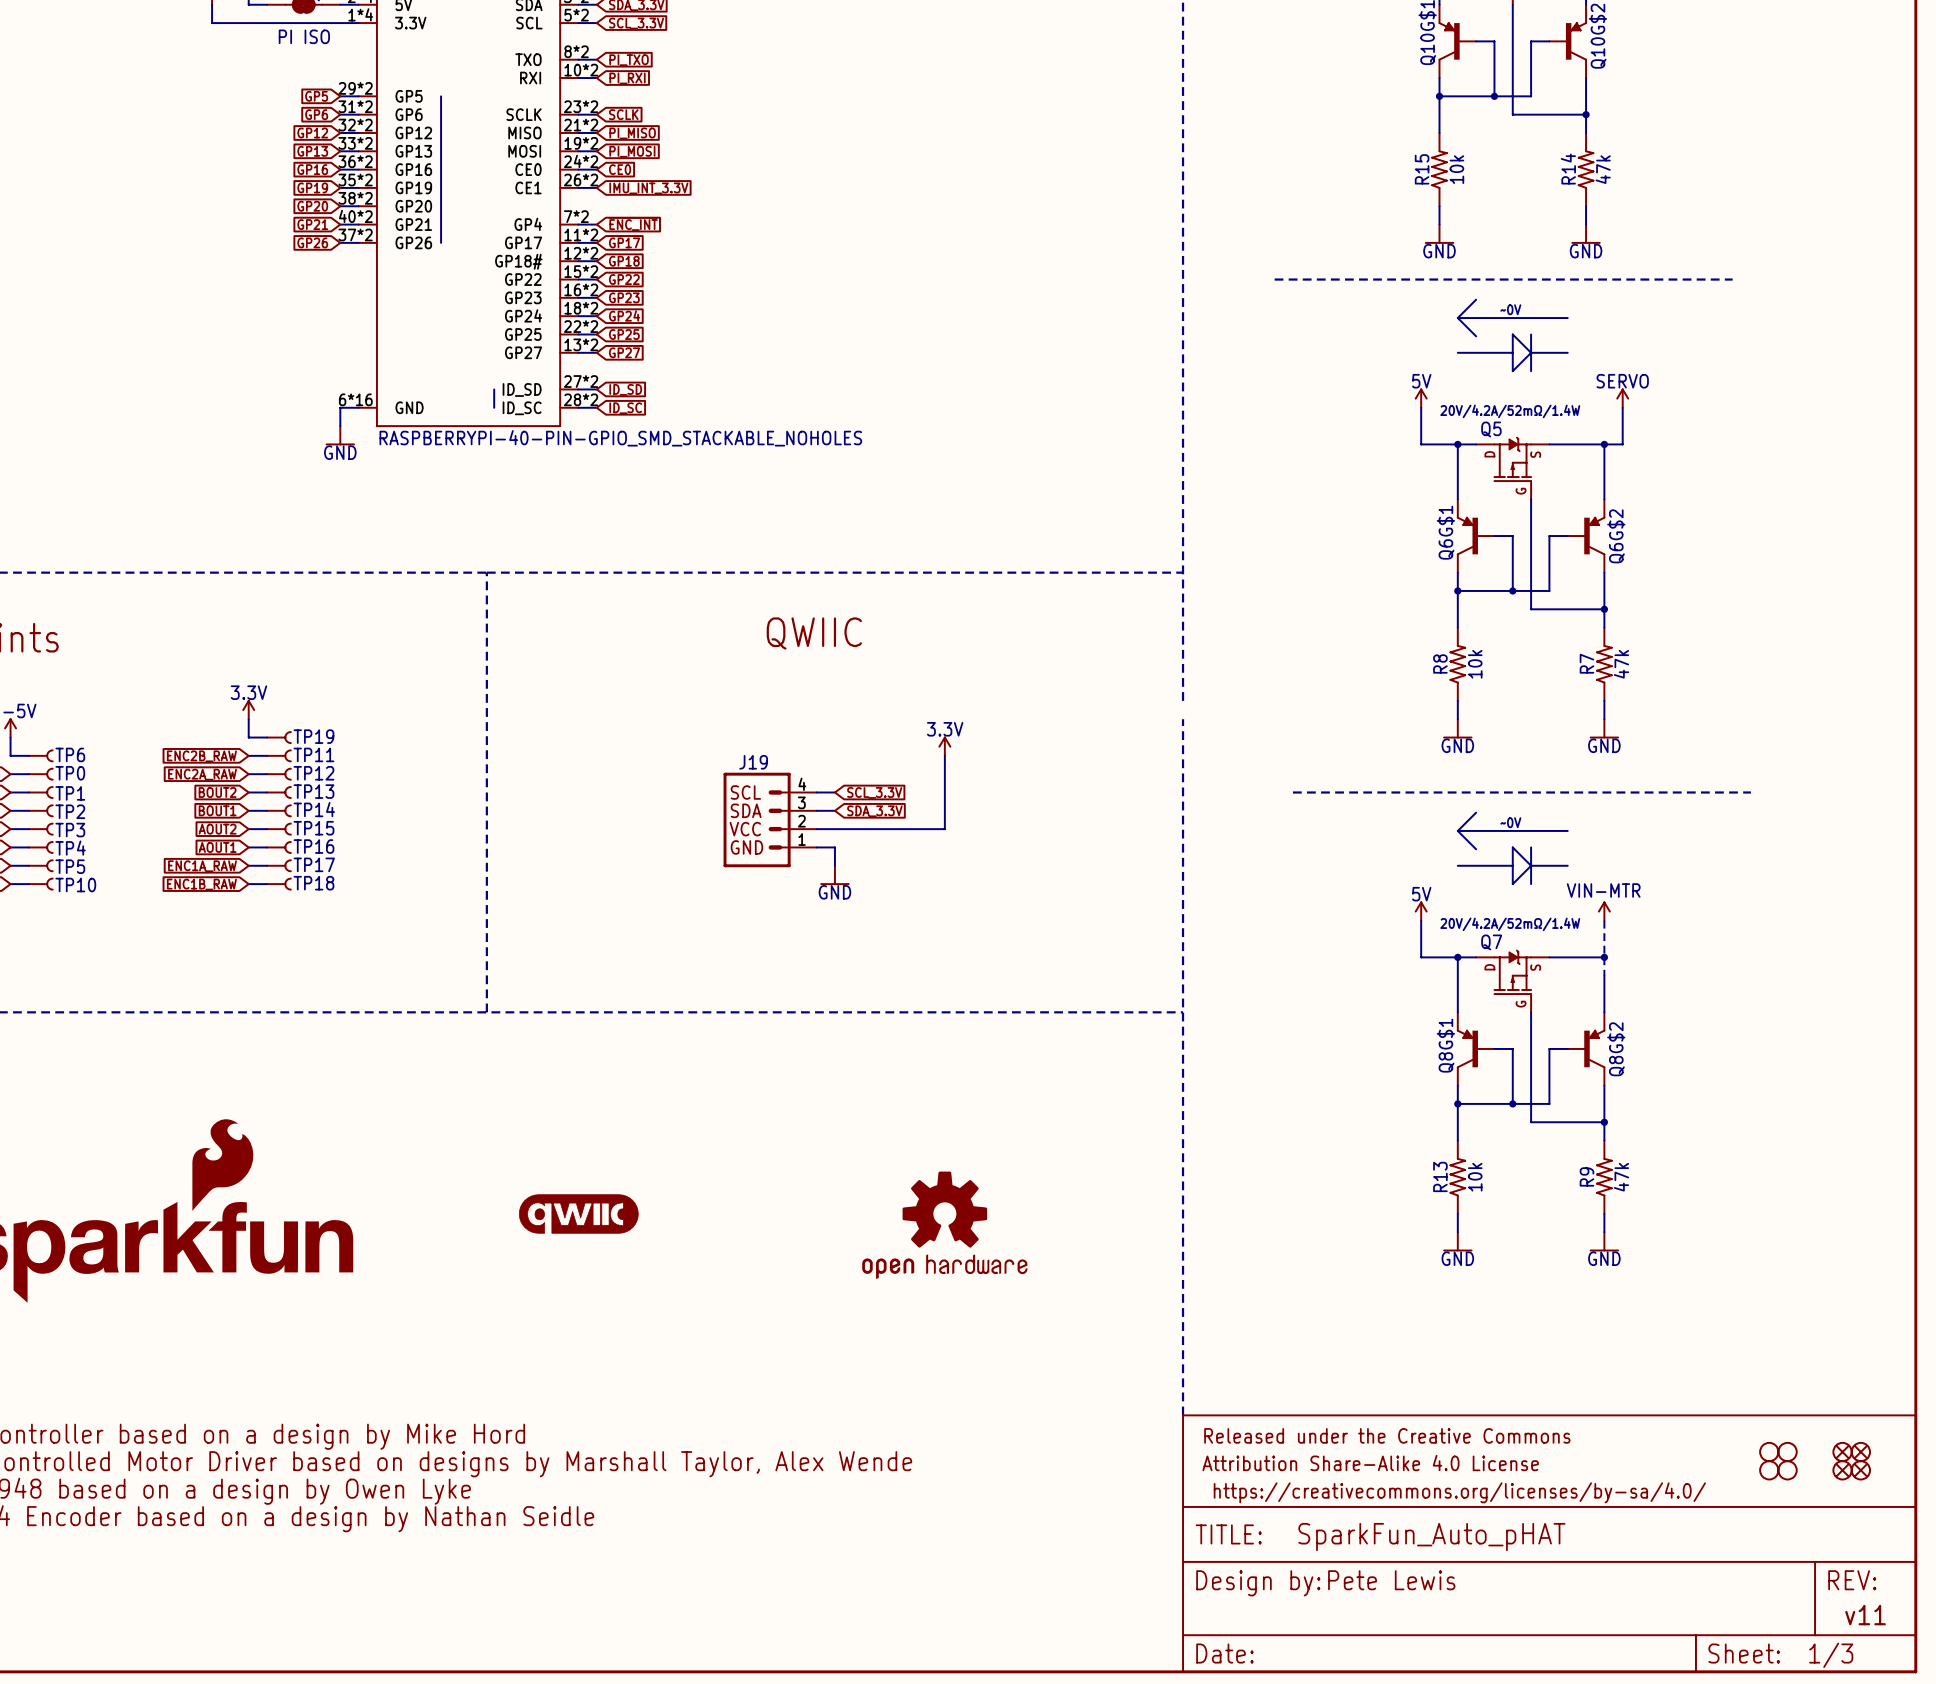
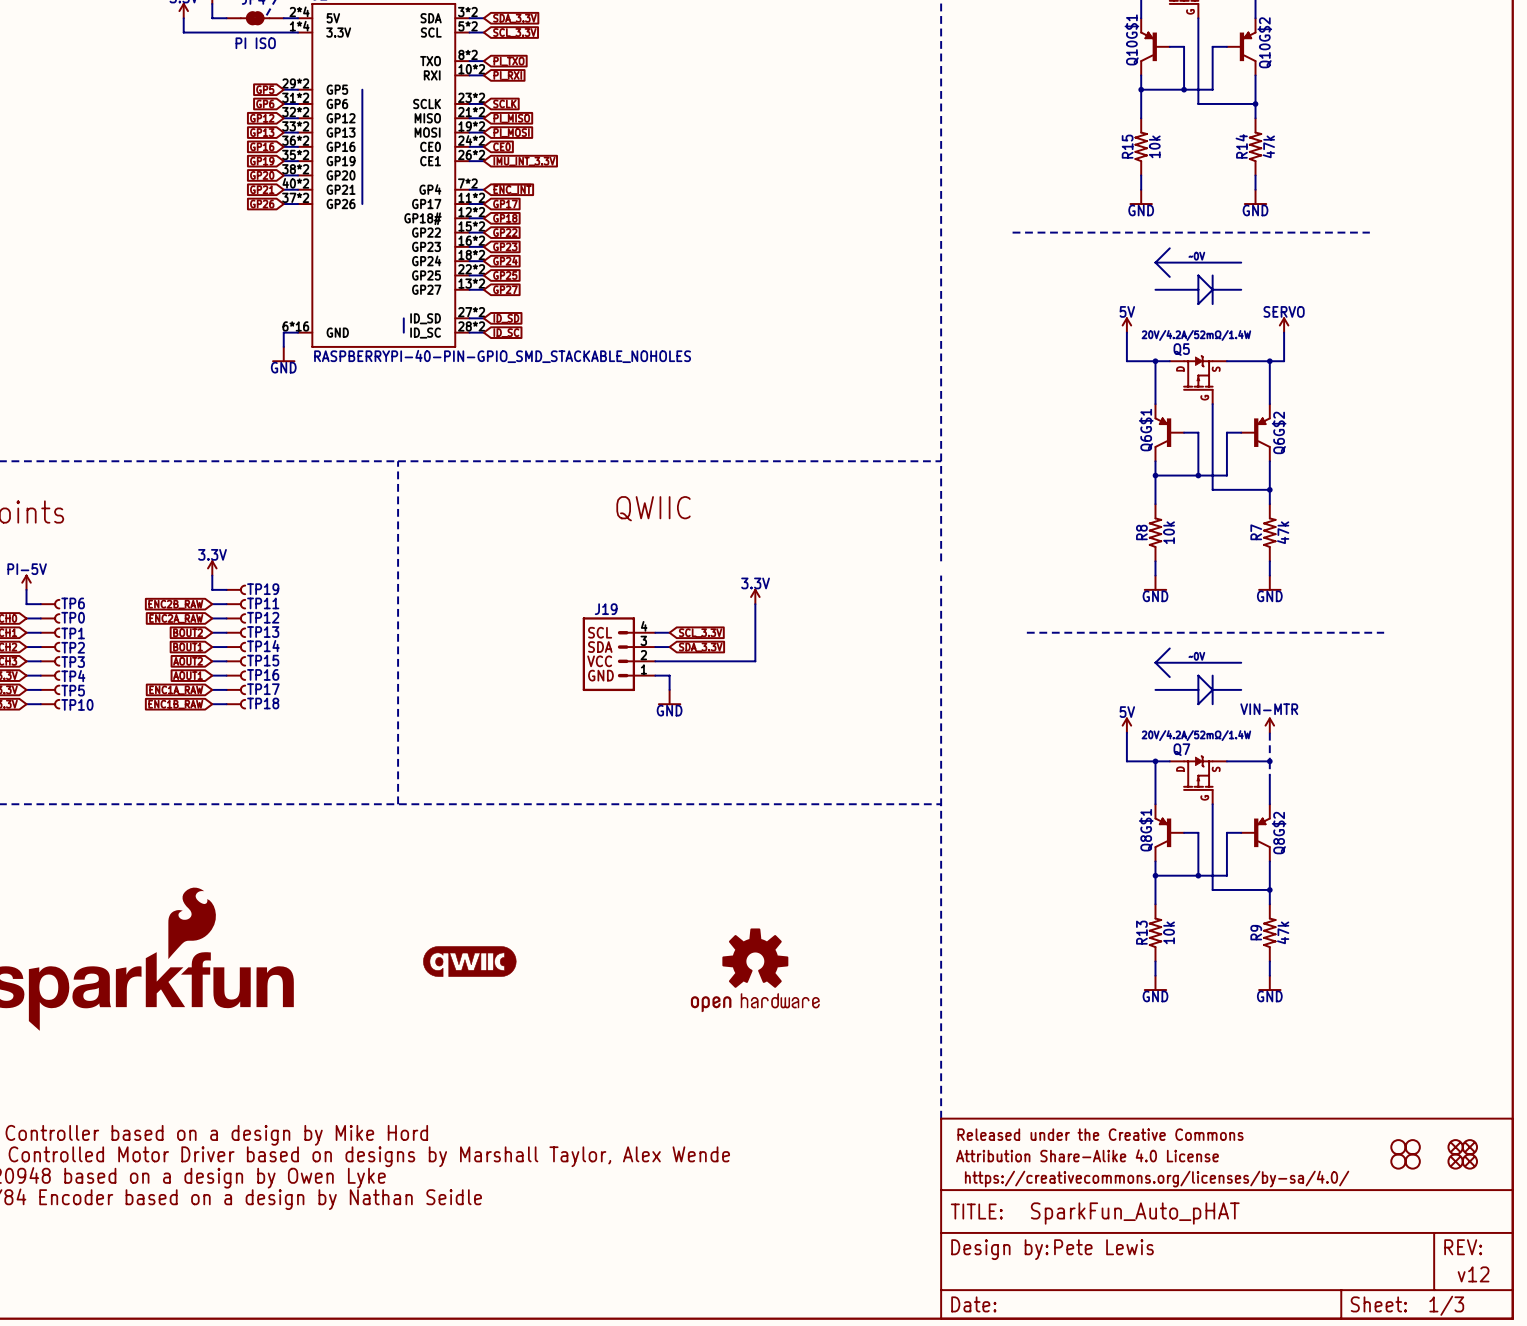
text: v11 (1865, 1615) -> v12 (1473, 1274)

